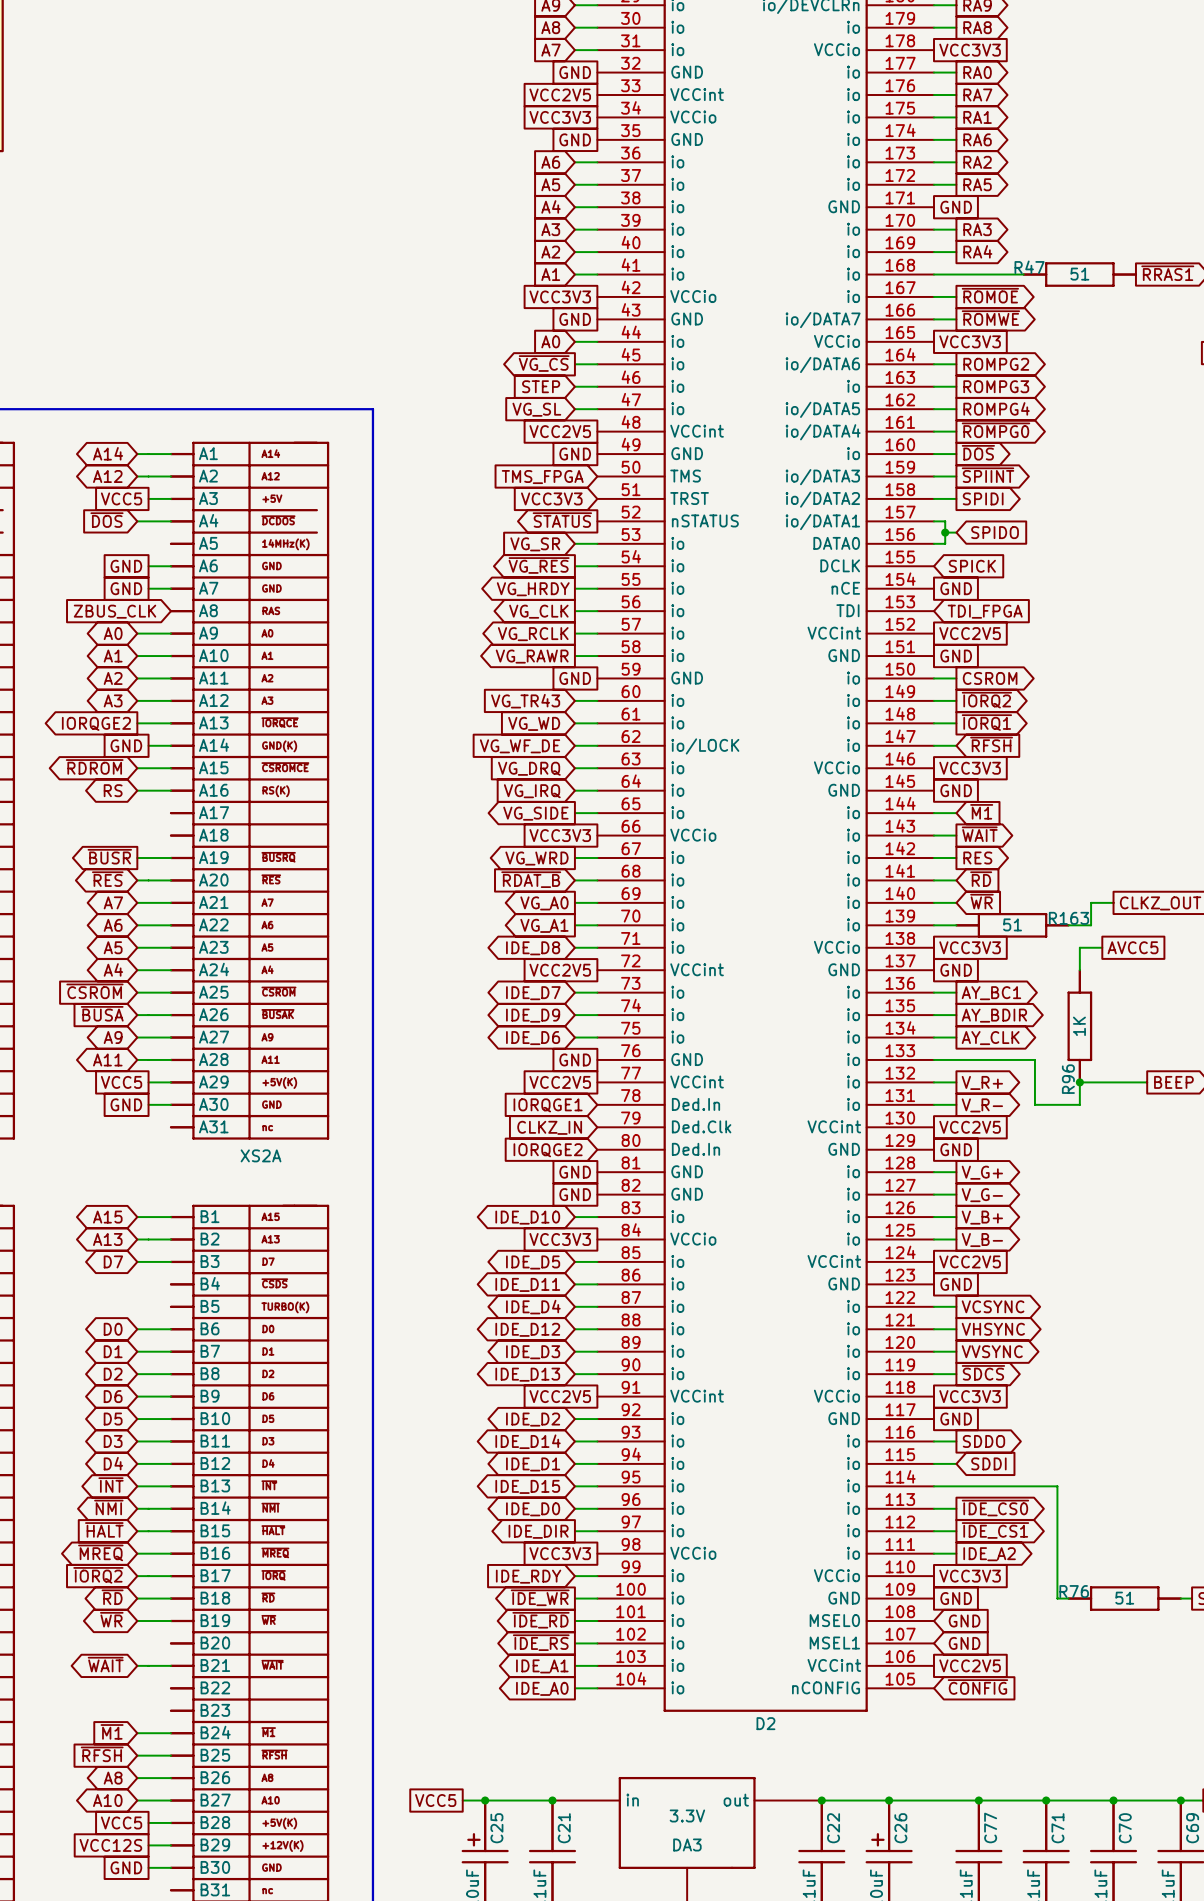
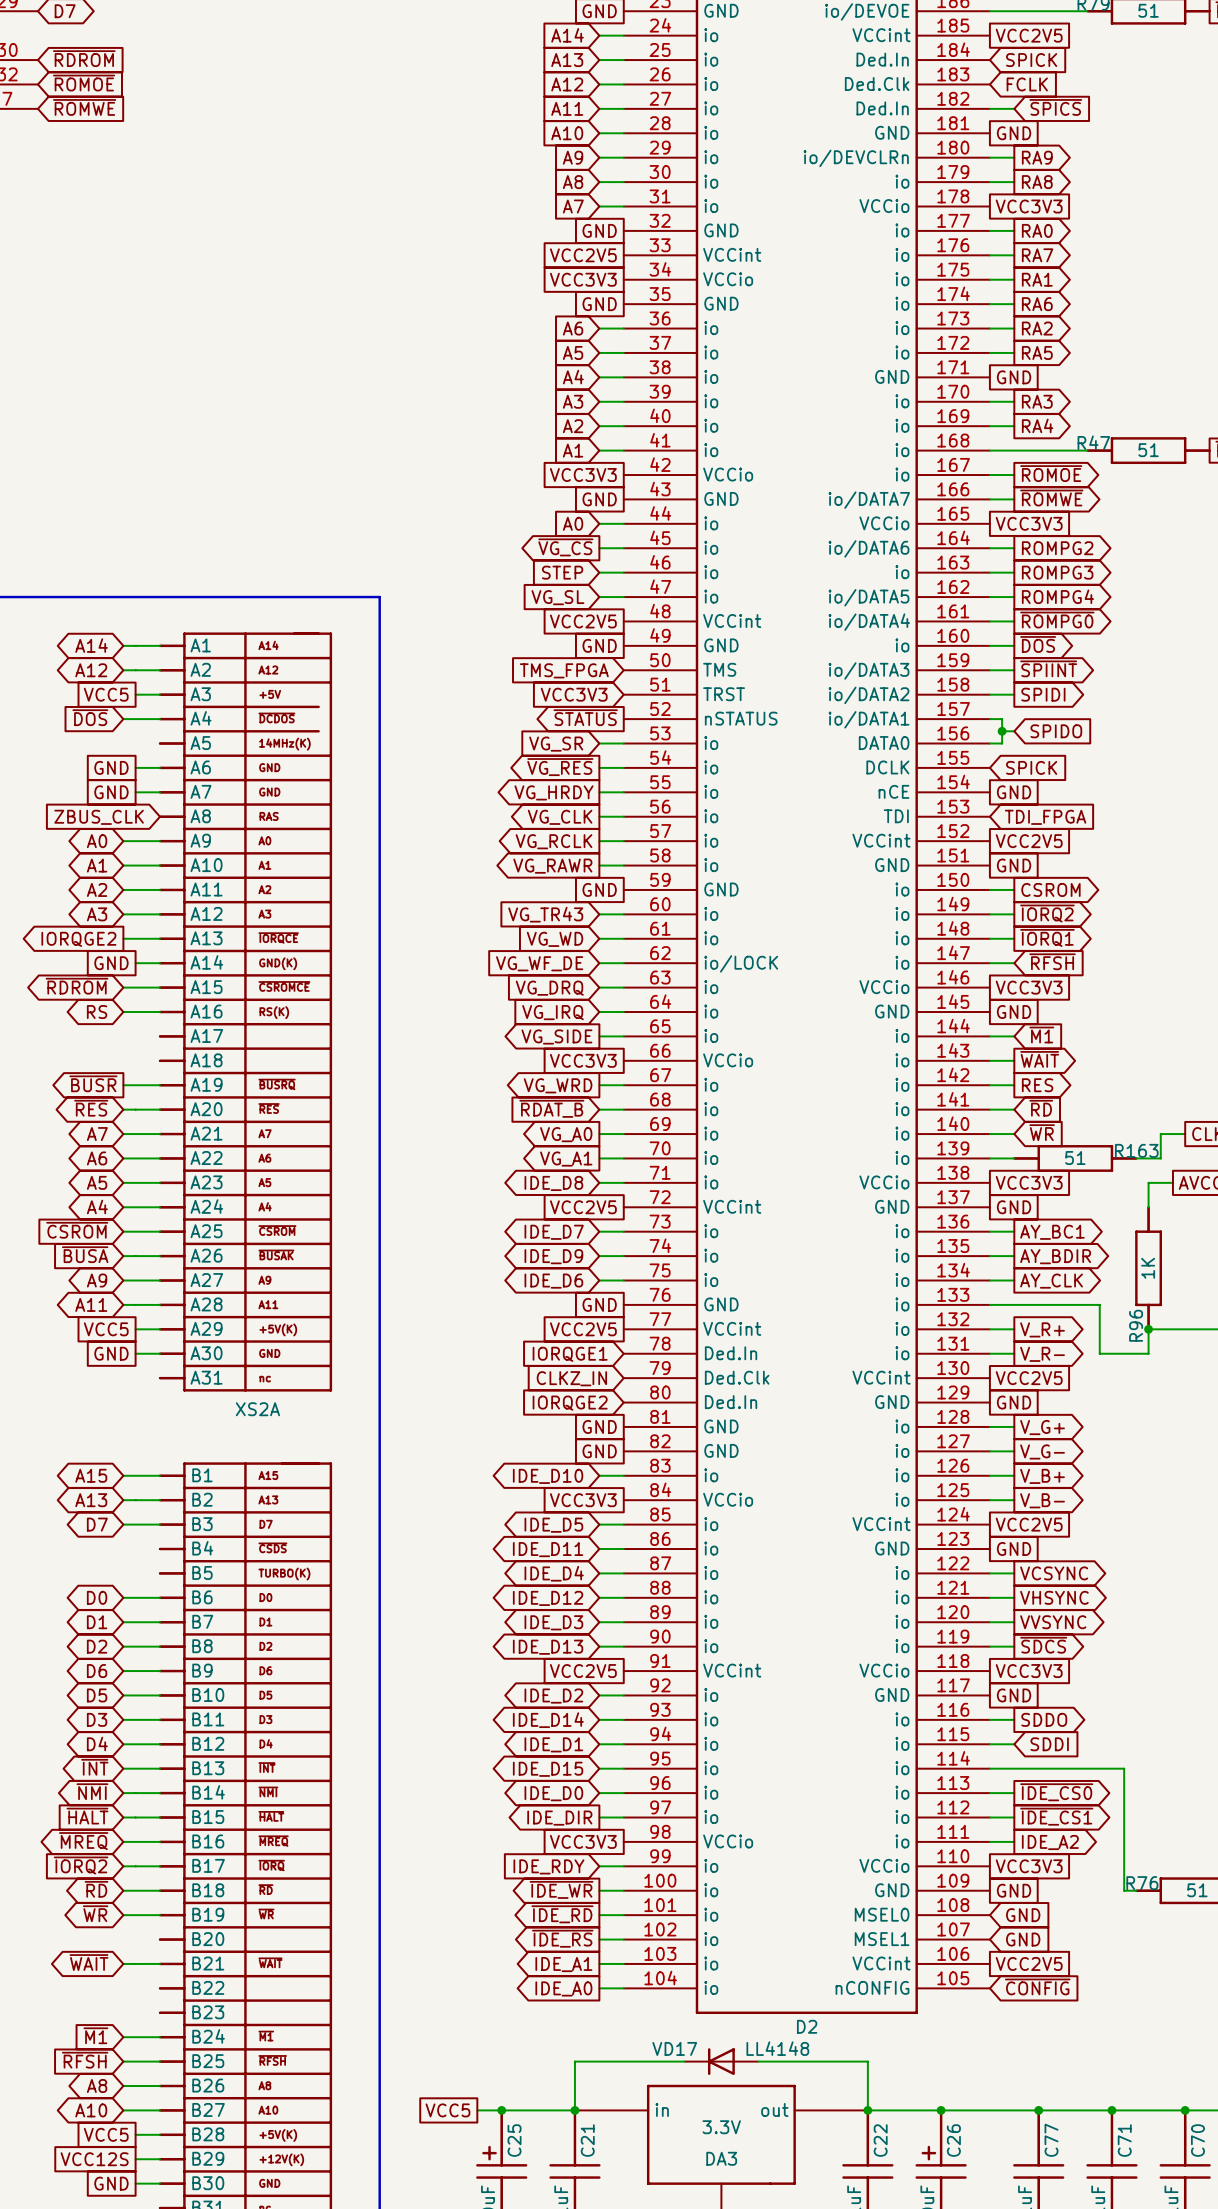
wire: none -> (684, 2061) (574, 2061) (574, 2110)
VD17: none -> LL4148 (721, 2061)
wire: none -> (758, 2061) (867, 2061) (867, 2110)

